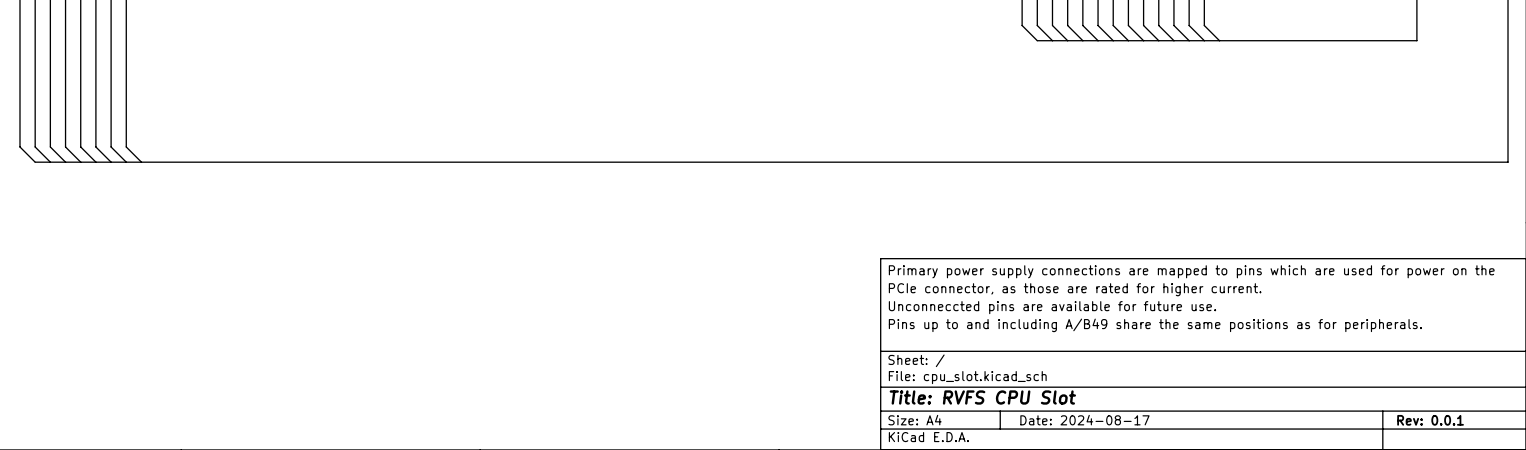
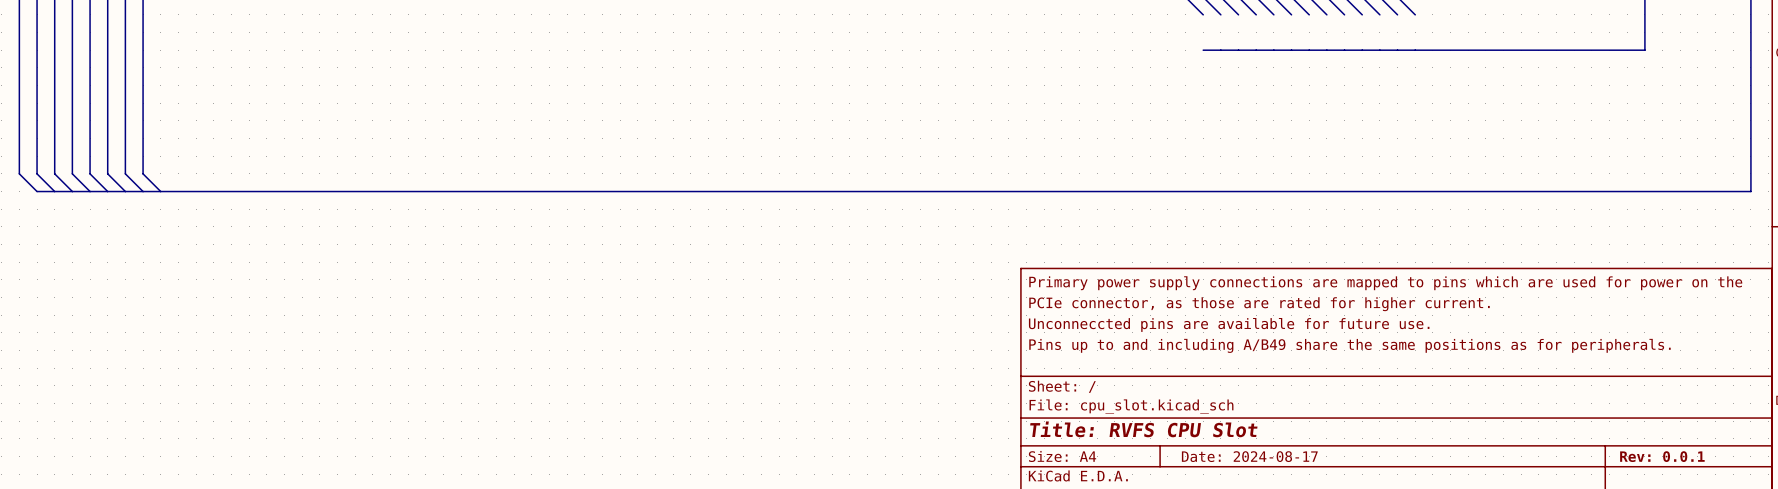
bus: (1037, 40) (1416, 40) -> (1203, 50) (1644, 50) (1644, 14)
wire: (19, 146) (35, 162) -> (19, 138) (19, 173) (37, 191)
wire: (35, 146) (50, 162) -> (37, 138) (37, 173) (54, 191)
wire: (50, 146) (65, 162) -> (54, 138) (54, 173) (72, 191)
wire: (65, 146) (80, 162) -> (72, 138) (72, 173) (90, 191)
wire: (80, 146) (95, 162) -> (90, 138) (90, 173) (107, 191)
wire: (95, 146) (111, 162) -> (107, 138) (107, 173) (125, 191)
wire: (111, 146) (126, 162) -> (125, 138) (125, 173) (143, 191)
wire: (126, 146) (141, 162) -> (143, 138) (143, 173) (160, 191)
bus: (35, 162) (1508, 162) -> (37, 191) (1750, 191) (1750, 156)

